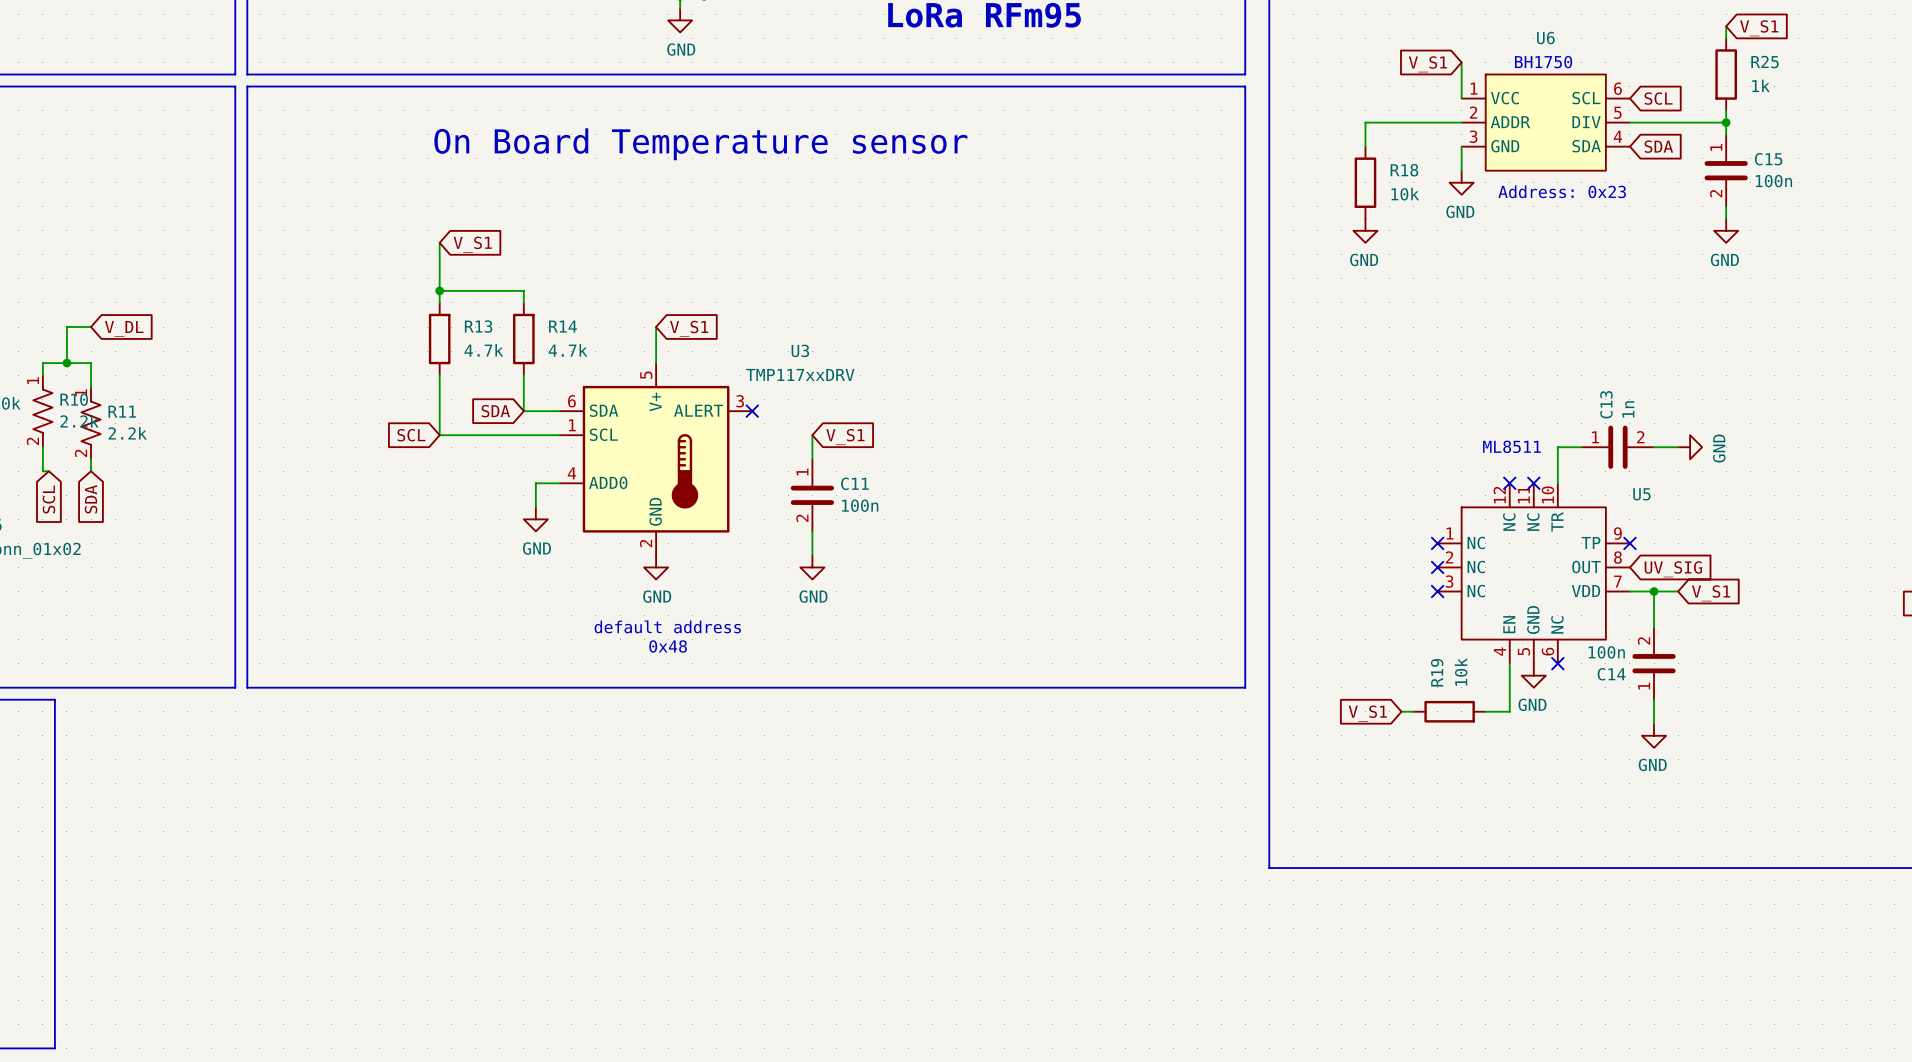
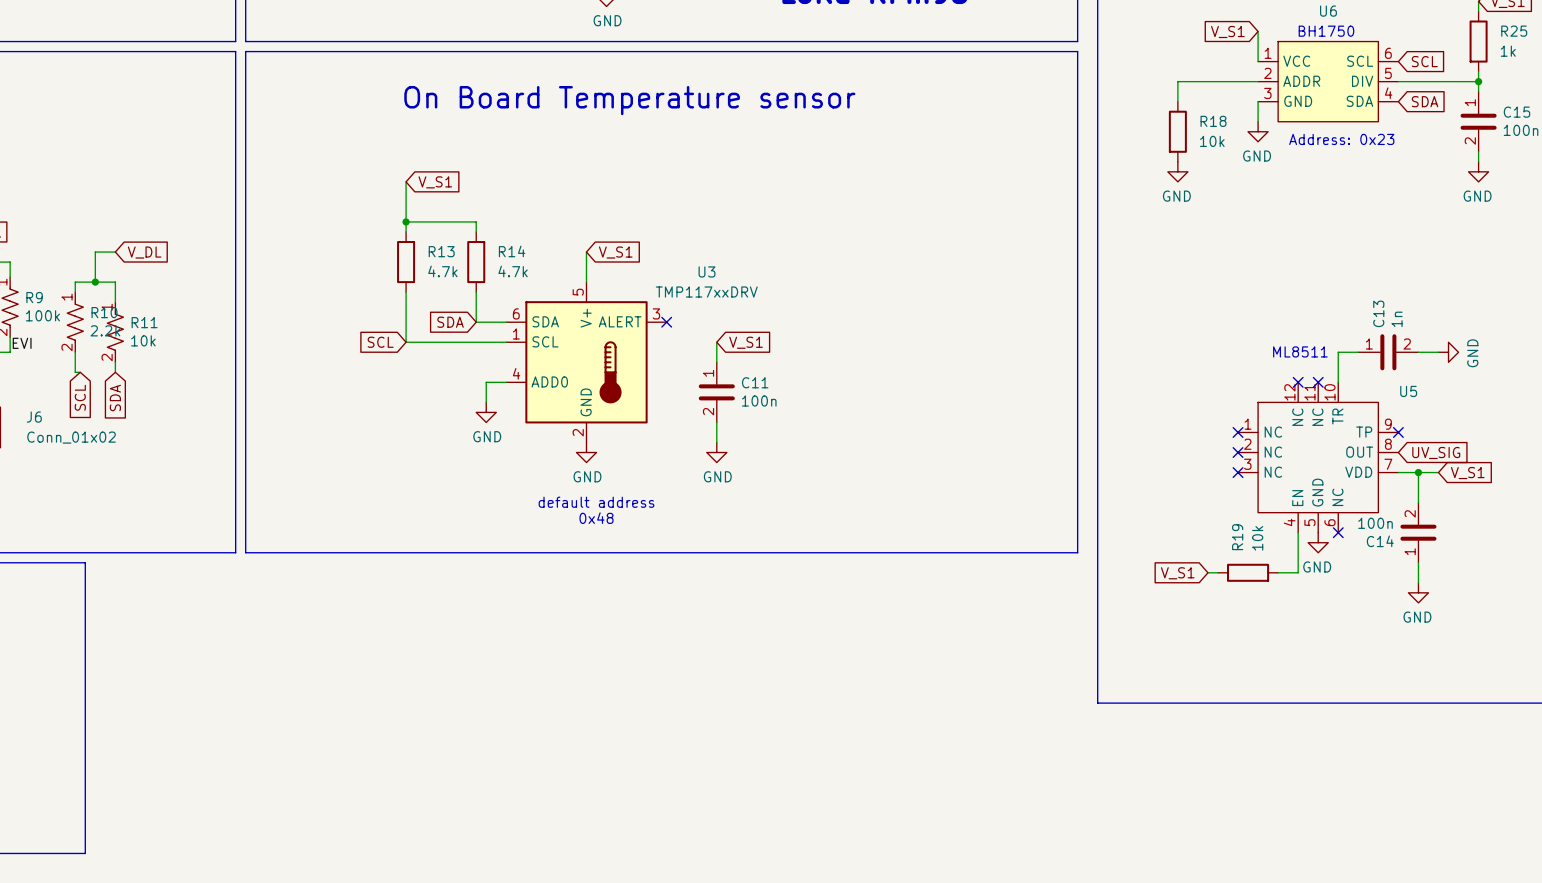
R11 value: 2.2k (127, 433) -> 10k (143, 340)

